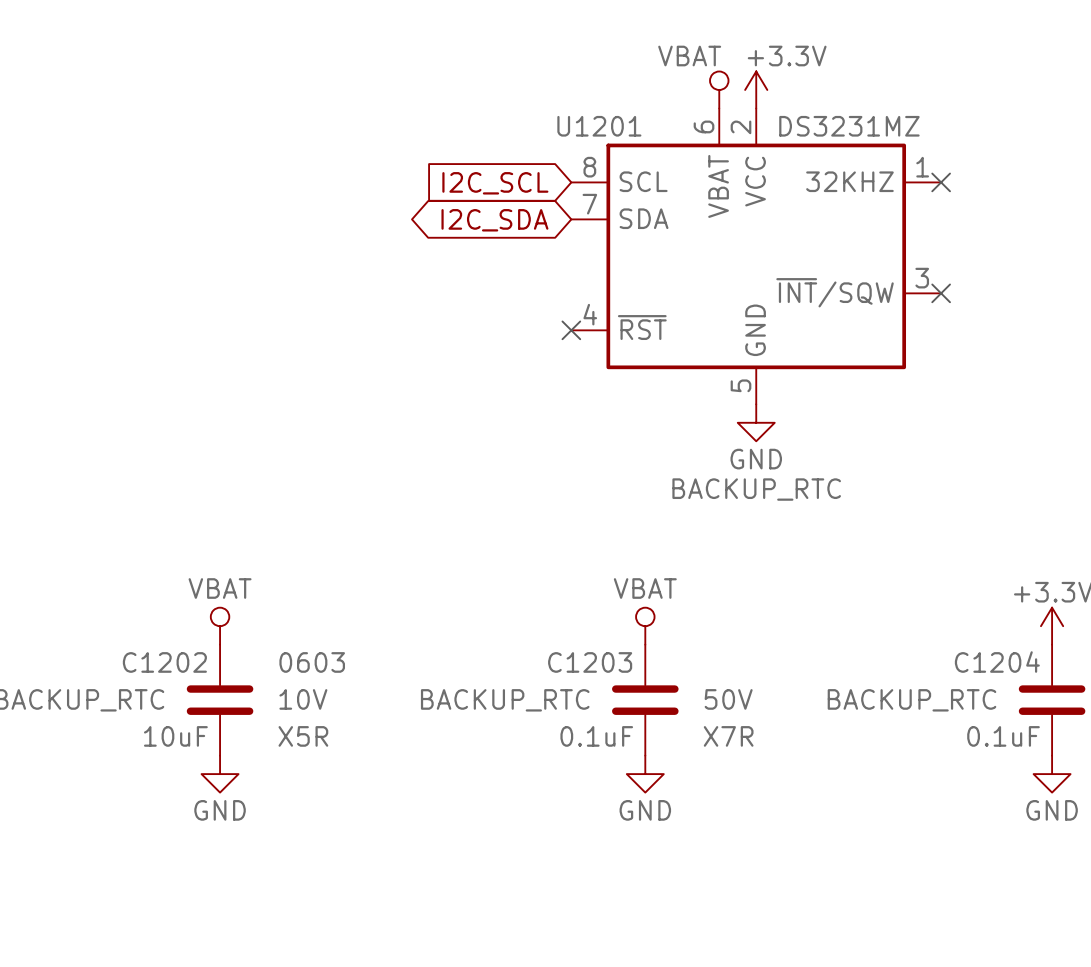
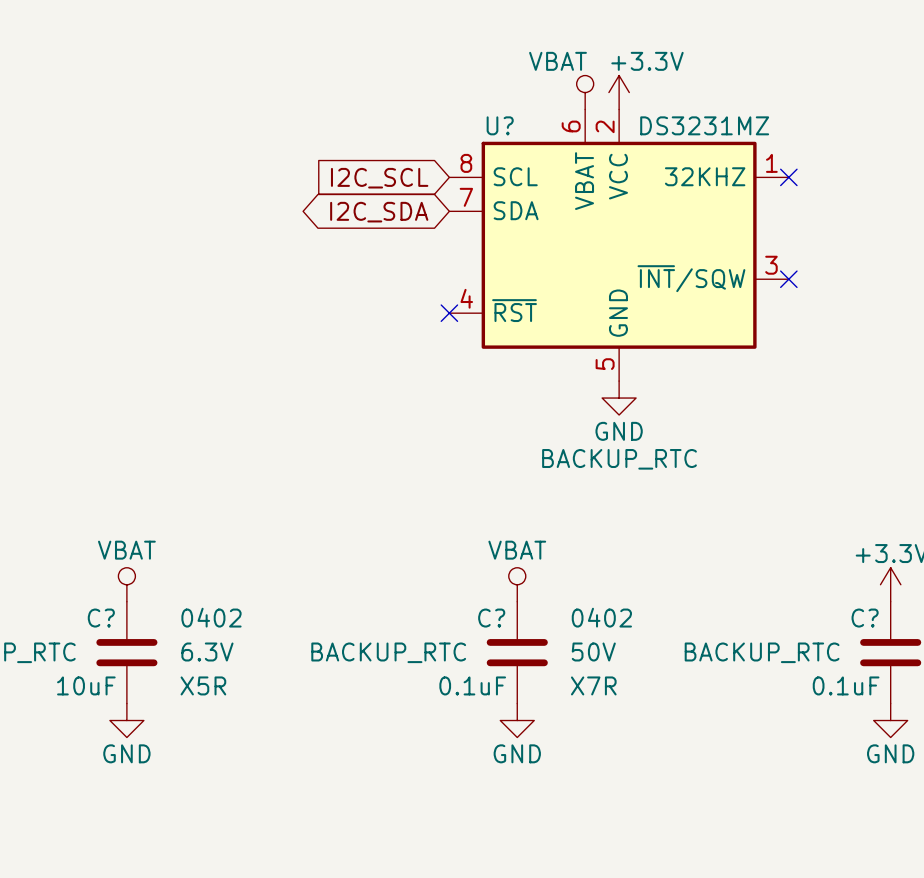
U1201 name: U1201 (599, 126) -> U? (500, 125)
C1202 name: C1202 (164, 662) -> C? (101, 618)
C1202 text: 0603 (312, 662) -> 0402 (211, 617)
C1203 name: C1203 (590, 662) -> C? (491, 618)
C1203 text: none -> 0402 (601, 617)
C1204 name: C1204 (997, 662) -> C? (865, 618)
C1202 text: 10V (303, 699) -> 6.3V (207, 651)

